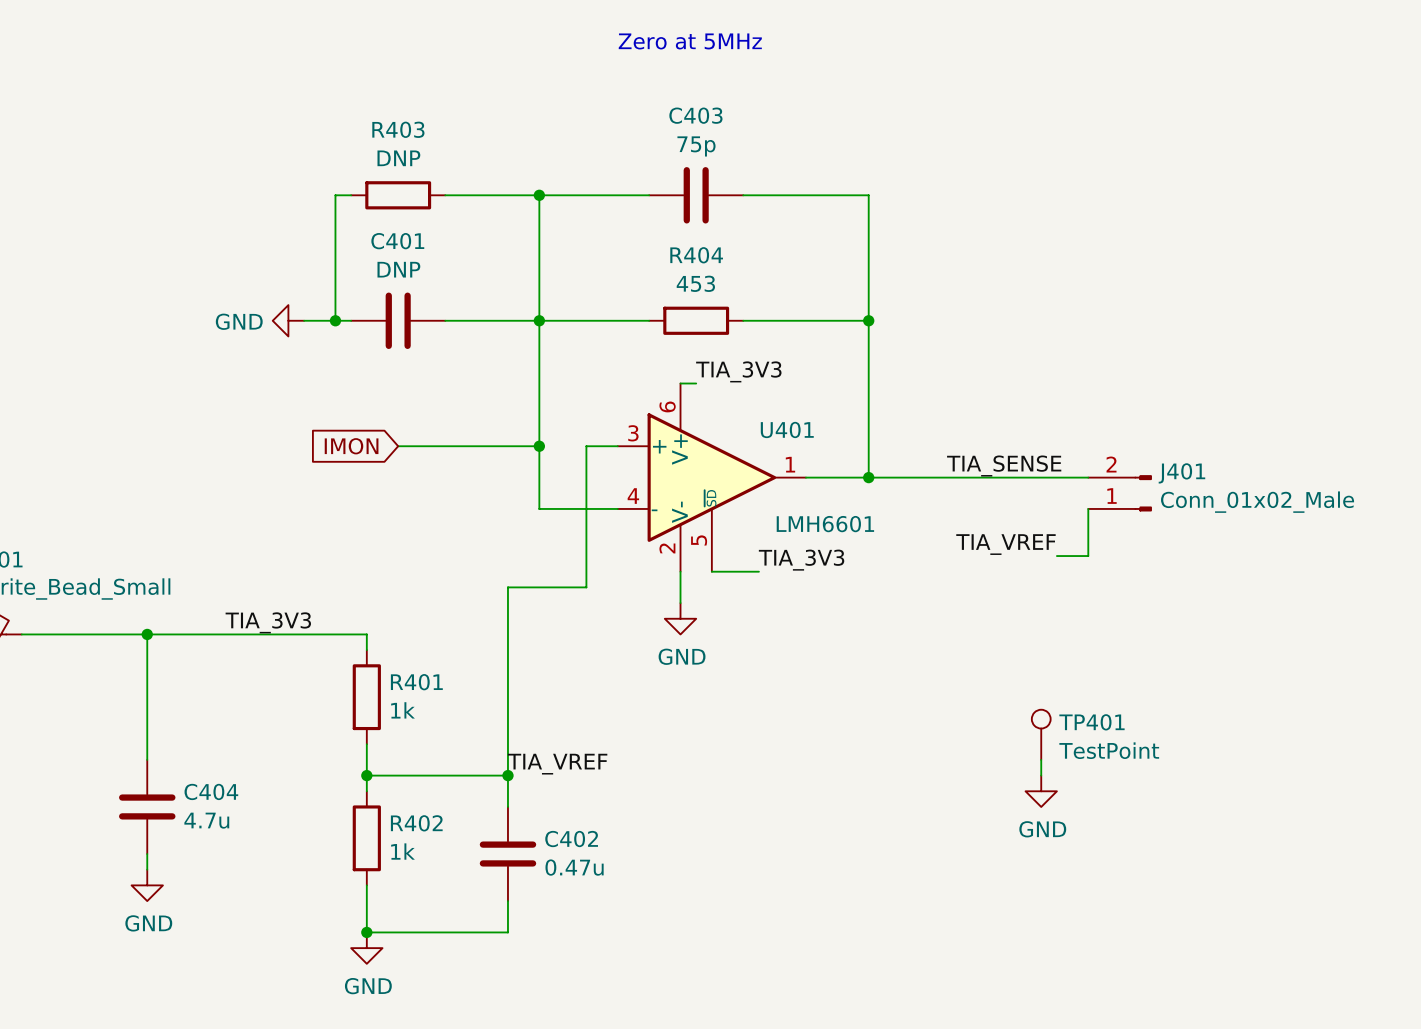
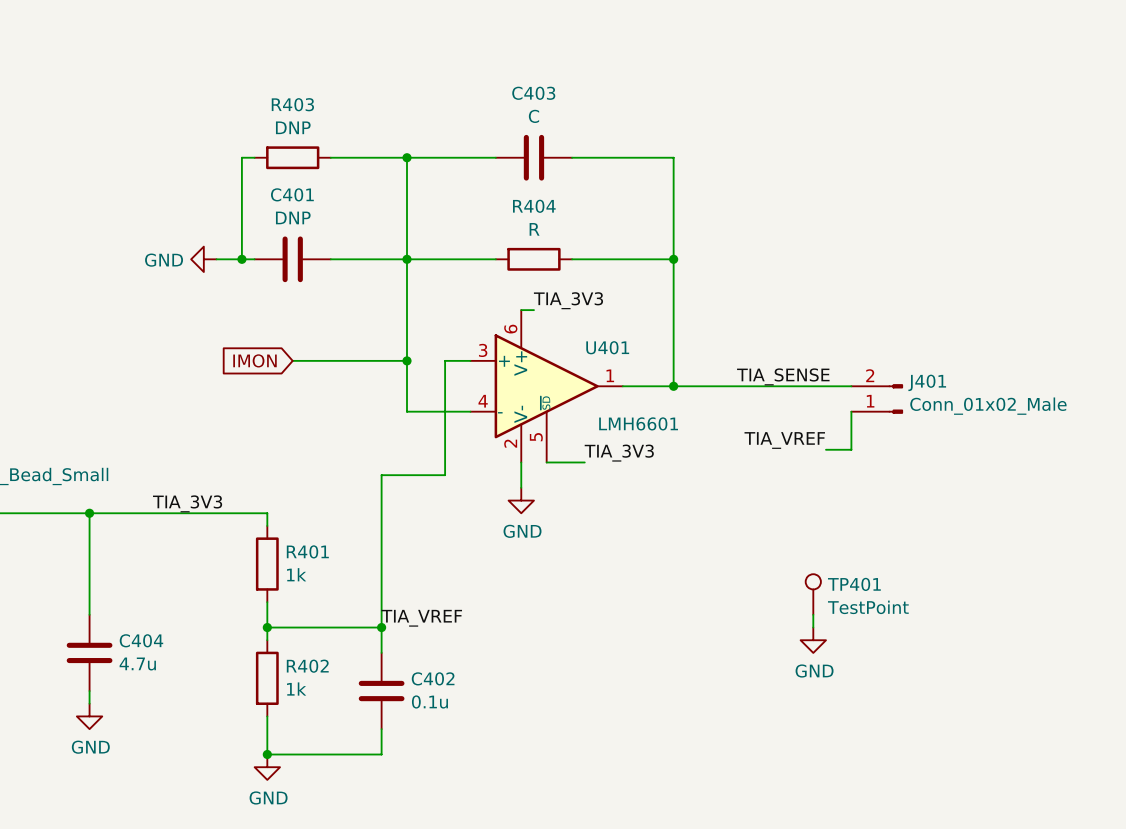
text: Zero at 5MHz (690, 41) -> none
C403 value: 75p (696, 146) -> C (533, 116)
R404 value: 453 (695, 283) -> R (534, 229)
C402 value: 0.47u (574, 867) -> 0.1u (429, 701)

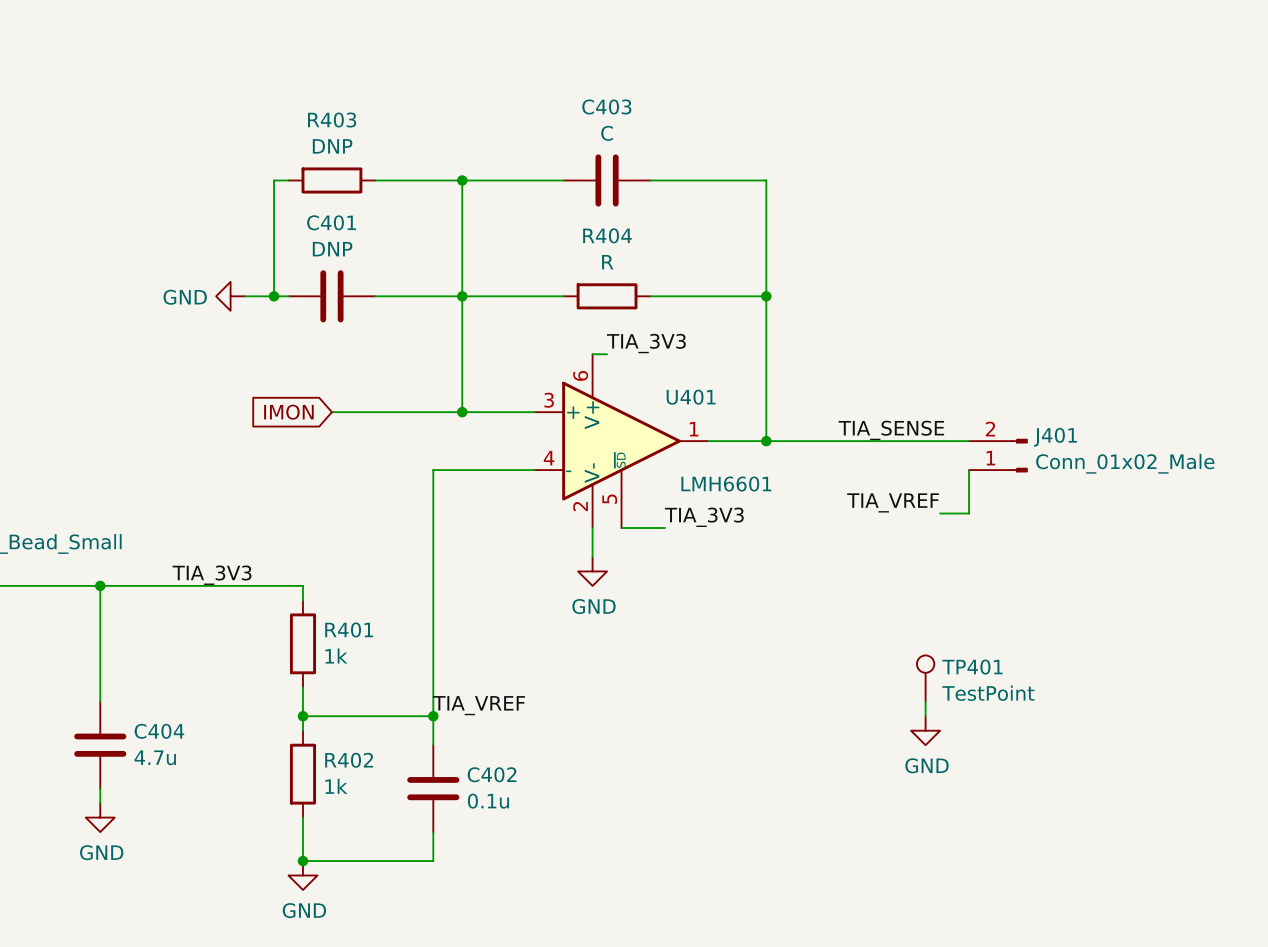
wire: (406, 360) (406, 411) -> (462, 412) (505, 412)
wire: (445, 360) (445, 475) (381, 475) -> (462, 470) (433, 470) (433, 542)

